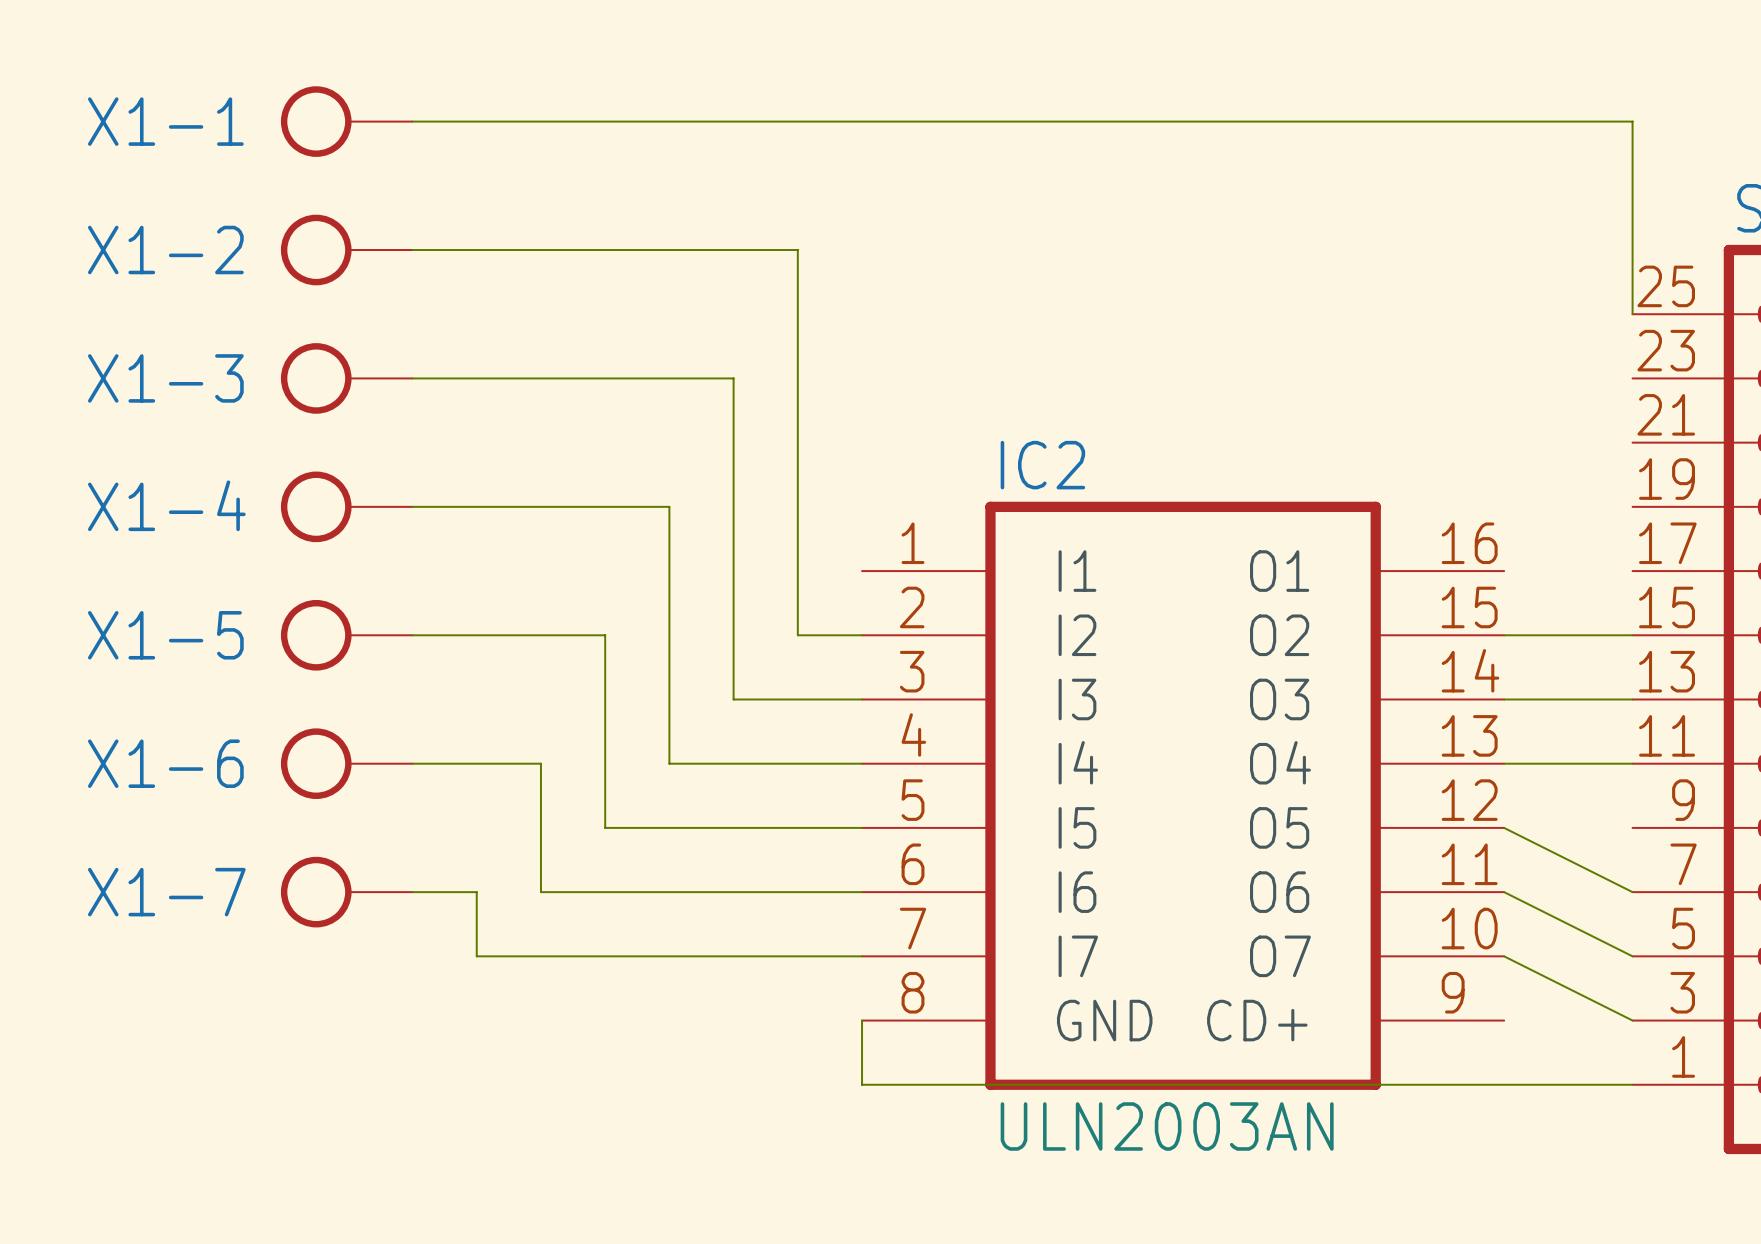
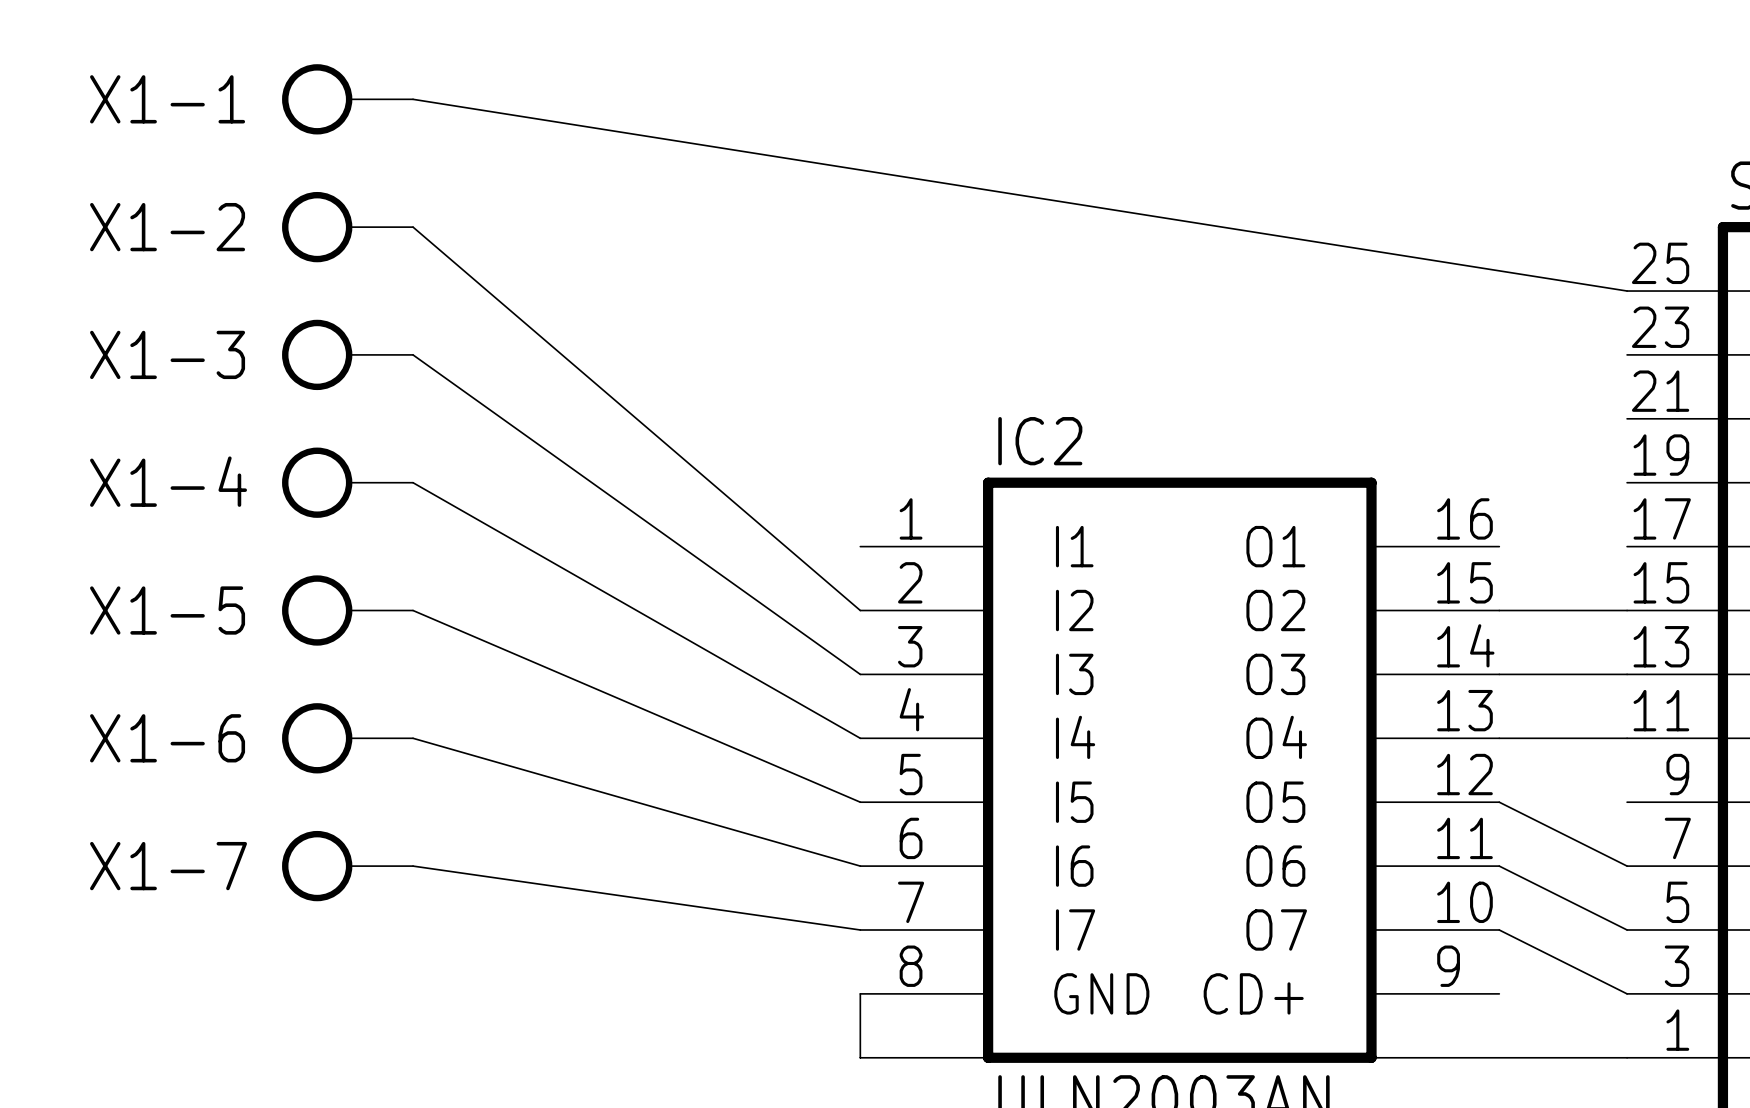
wire: (412, 121) (1632, 121) (1632, 314) -> (413, 99) (1627, 291)
wire: (412, 250) (797, 250) (797, 635) (862, 635) -> (413, 227) (860, 610)
wire: (412, 378) (733, 378) (733, 699) (862, 699) -> (413, 354) (860, 674)
wire: (412, 506) (669, 506) (669, 763) (862, 763) -> (413, 482) (860, 738)
wire: (412, 635) (605, 635) (605, 827) (862, 827) -> (413, 610) (860, 802)
wire: (412, 763) (540, 763) (540, 892) (862, 892) -> (413, 738) (860, 866)
wire: (412, 892) (476, 892) (476, 956) (862, 956) -> (413, 866) (860, 929)

